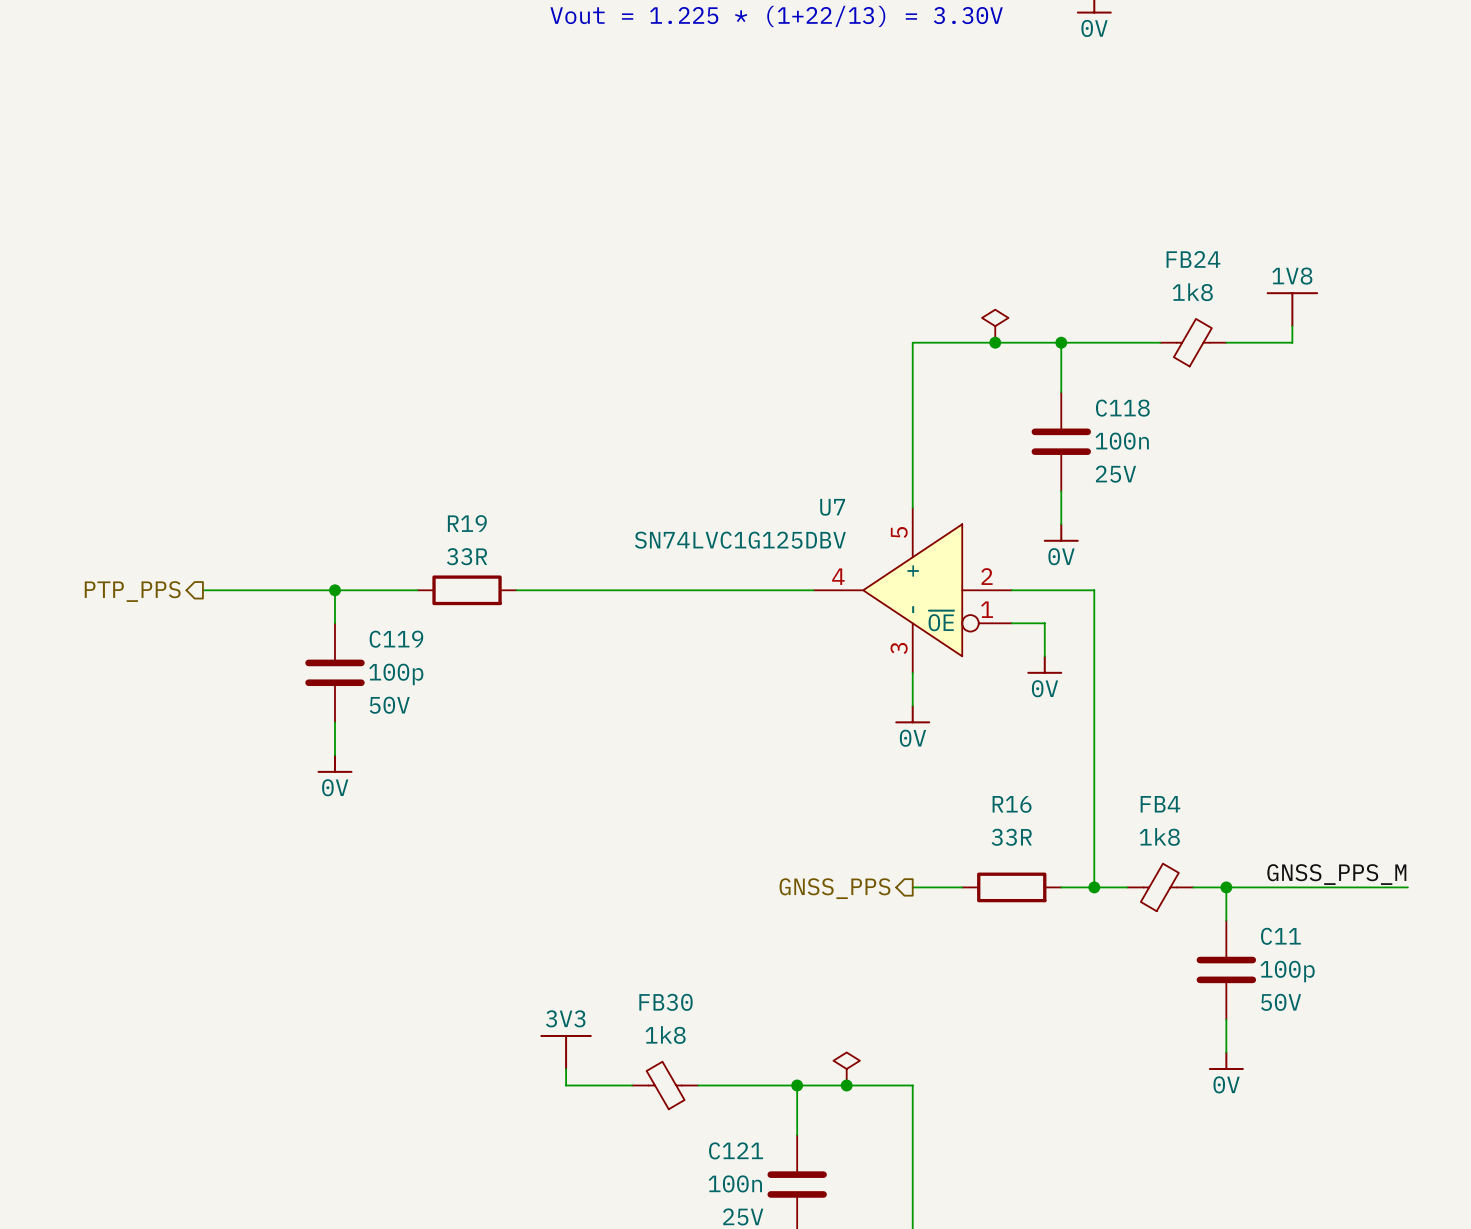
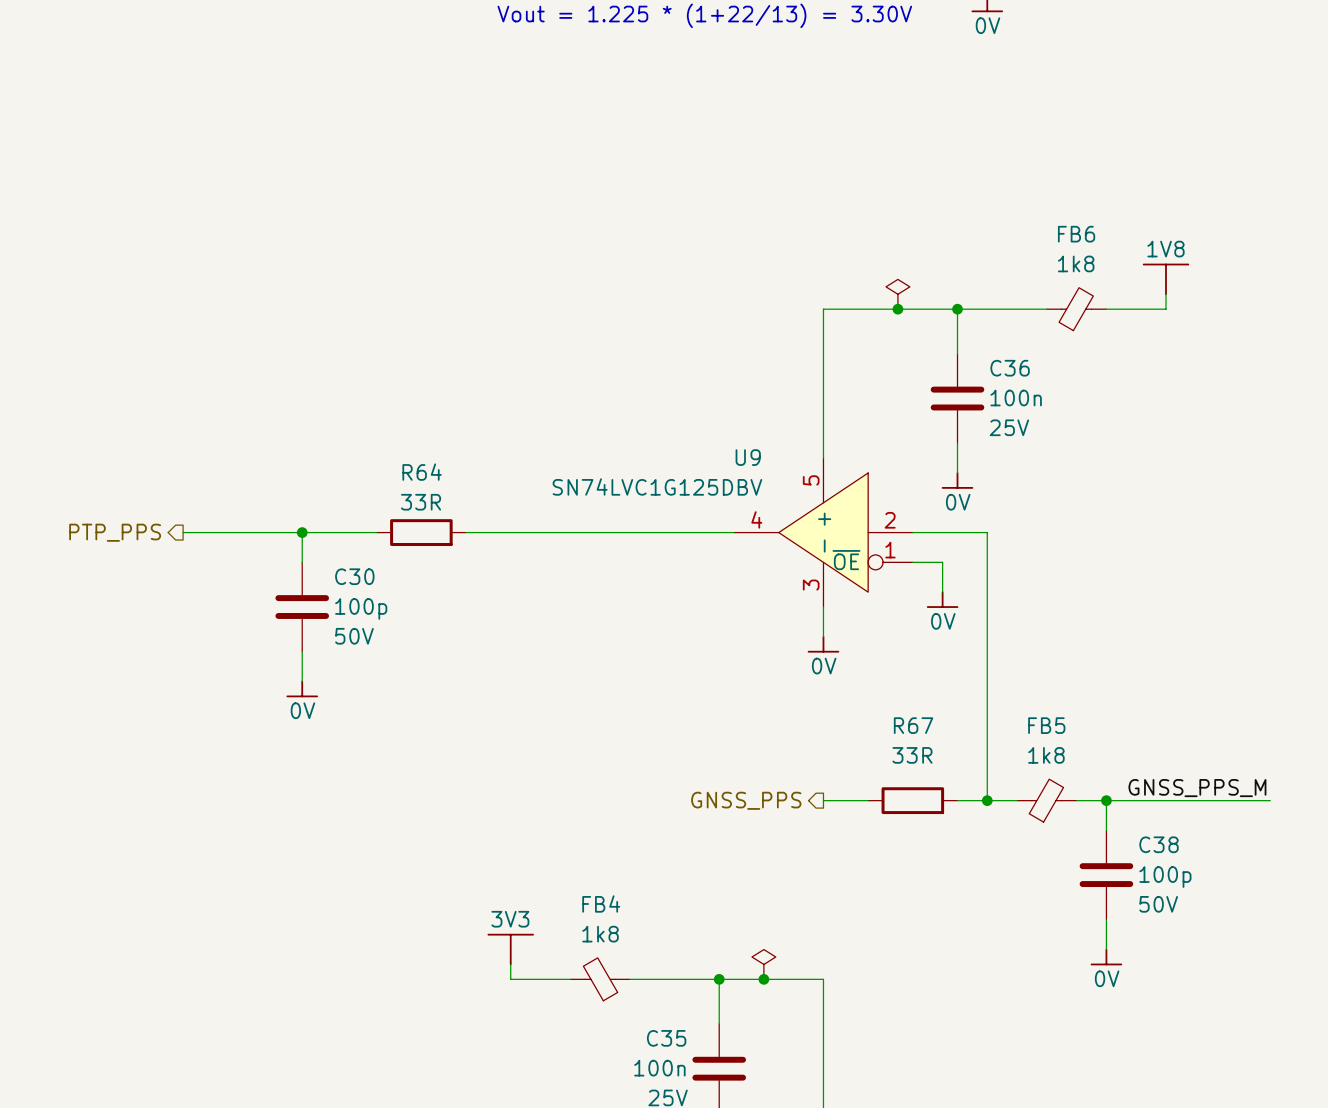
FB24 name: FB24 (1193, 259) -> FB6 (1076, 234)
C118 name: C118 (1122, 408) -> C36 (1010, 368)
U7 name: U7 (832, 507) -> U9 (748, 457)
R19 name: R19 (467, 523) -> R64 (422, 472)
C119 name: C119 (396, 639) -> C30 (354, 576)
R16 name: R16 (1012, 804) -> R67 (913, 725)
FB4 name: FB4 (1160, 804) -> FB5 (1046, 725)
C11 name: C11 (1280, 936) -> C38 (1159, 844)
FB30 name: FB30 (666, 1002) -> FB4 (601, 903)
C121 name: C121 (736, 1150) -> C35 (666, 1038)

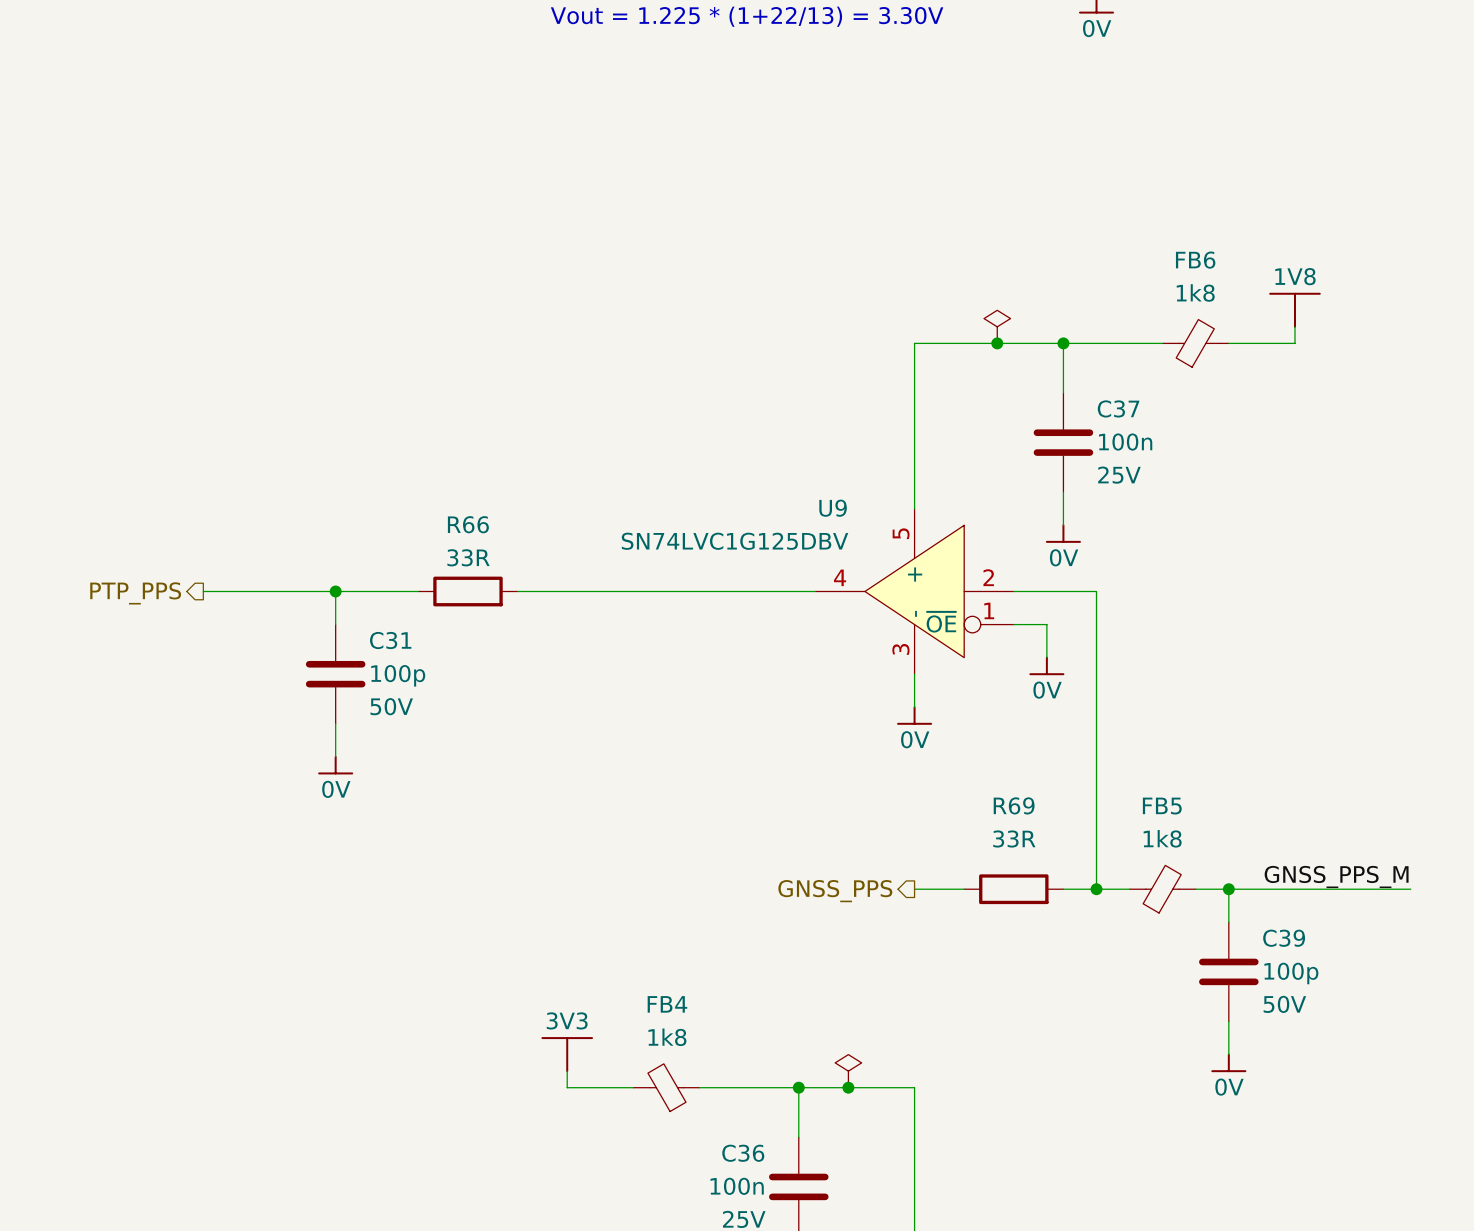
C36 name: C36 (1010, 368) -> C37 (1118, 408)
R64 name: R64 (422, 472) -> R66 (468, 524)
C30 name: C30 (354, 576) -> C31 (390, 640)
R67 name: R67 (913, 725) -> R69 (1014, 805)
C38 name: C38 (1159, 844) -> C39 (1284, 938)
C35 name: C35 (666, 1038) -> C36 (743, 1153)

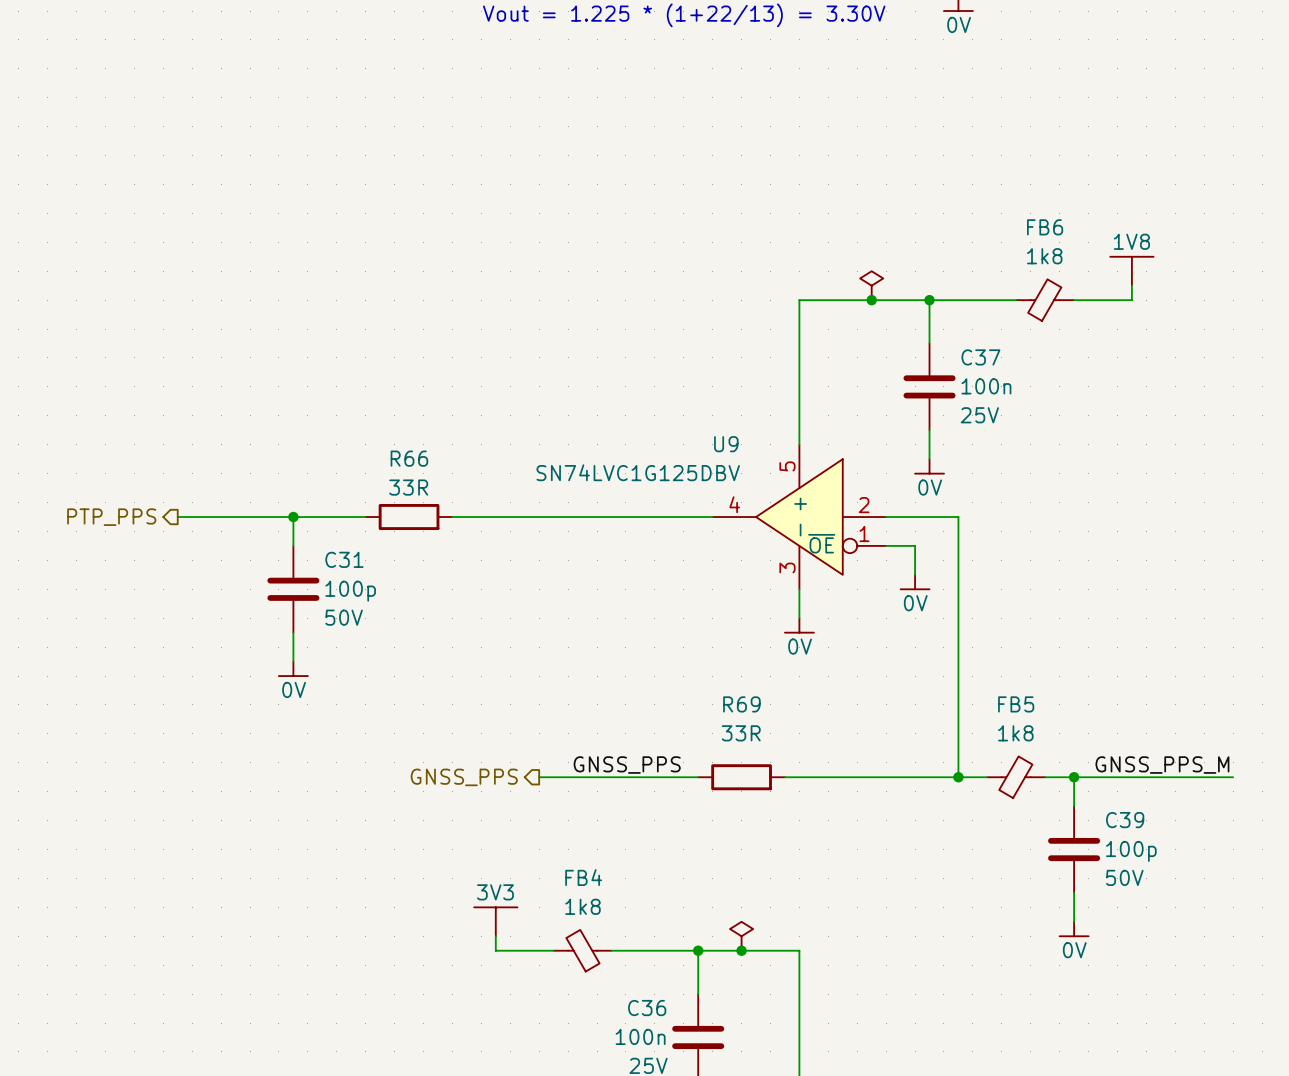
label: none -> GNSS_PPS (627, 765)
wire: none -> (539, 777) (698, 777)
wire: none -> (784, 777) (799, 777)
wire: none -> (842, 777) (929, 777)
R69 position: (1013, 889) -> (741, 777)
hierarchical label position: GNSS_PPS (835, 891) -> GNSS_PPS (464, 777)

